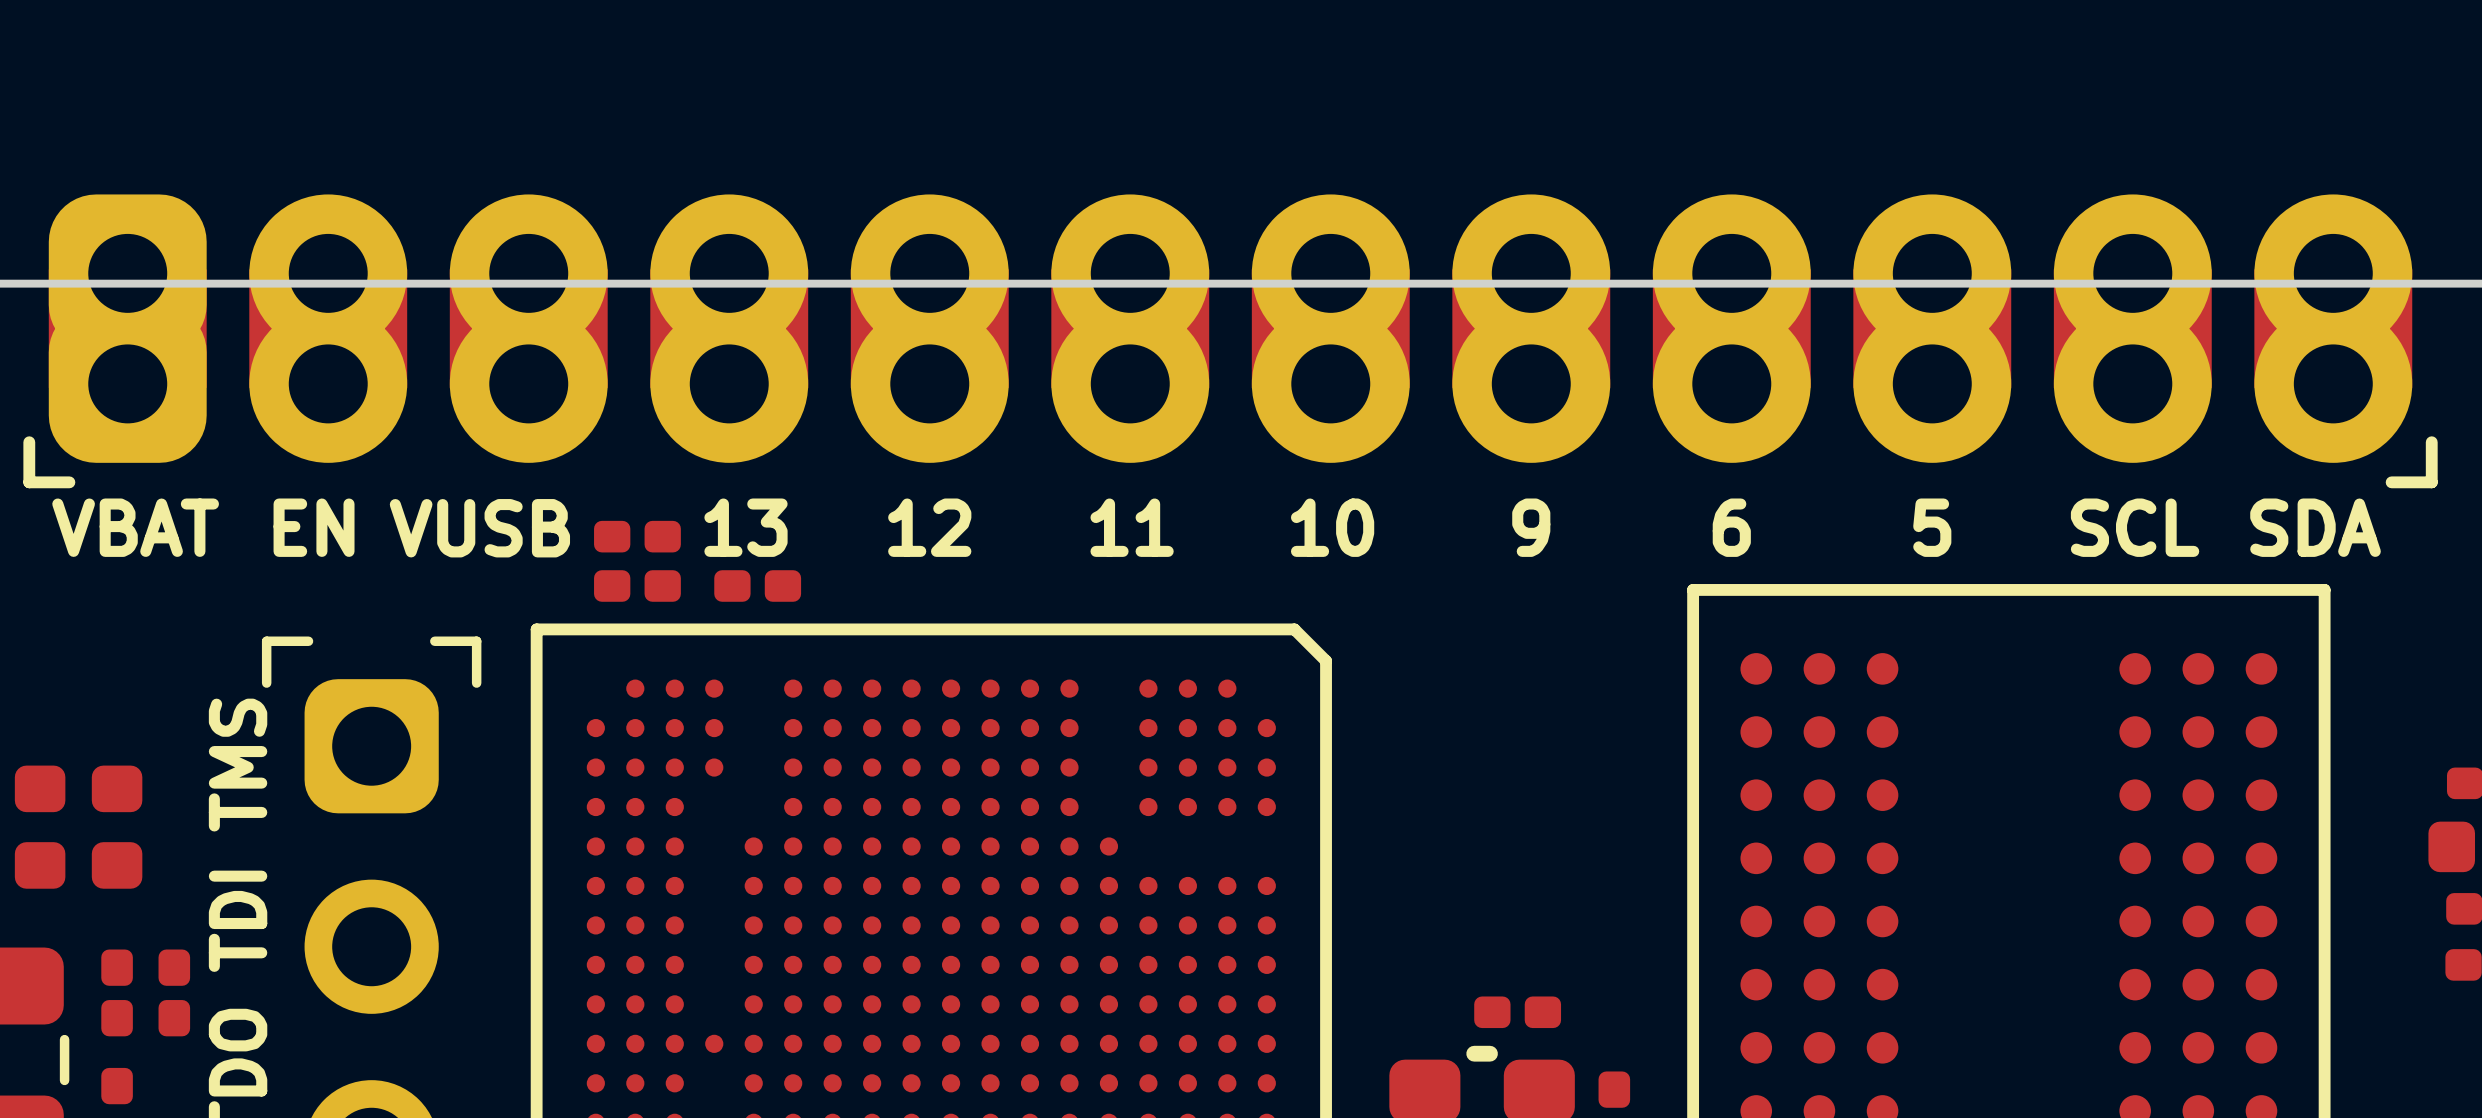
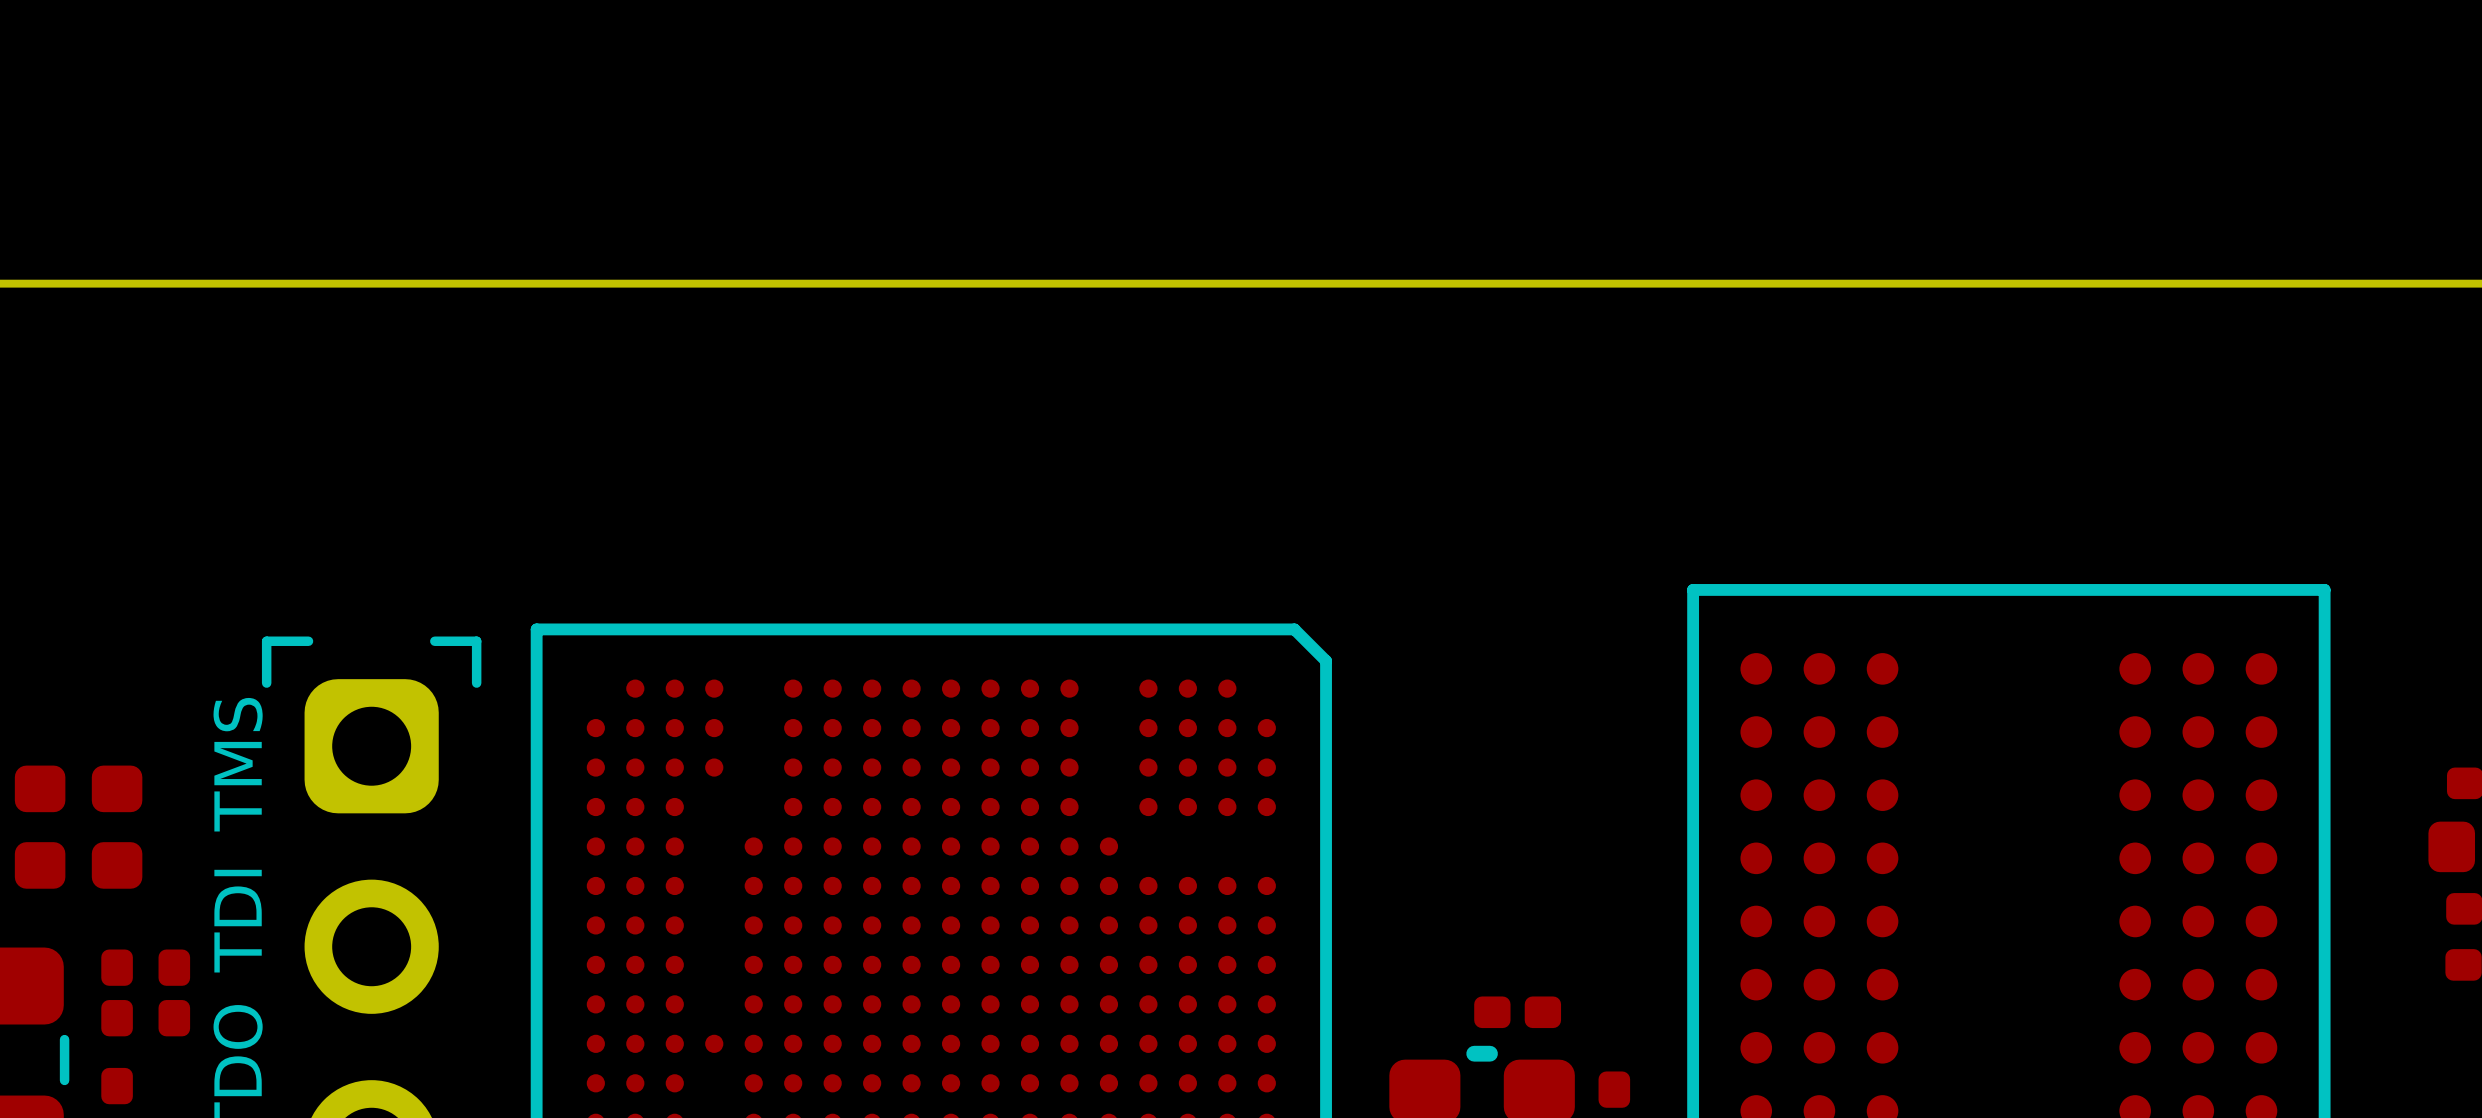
part: (1230, 341) -> none
text: VBAT (135, 527) -> none
text: EN (314, 527) -> none
text: 13 (745, 527) -> none
text: 12 (929, 527) -> none
text: 11 (1132, 527) -> none
text: 10 (1332, 527) -> none
text: 9 (1531, 527) -> none
text: 6 (1731, 527) -> none
text: 5 (1932, 527) -> none
text: SCL (2135, 527) -> none
text: SDA (2315, 527) -> none
text: VUSB (479, 528) -> none
part: (637, 536) -> none
part: (637, 585) -> none
part: (757, 585) -> none

